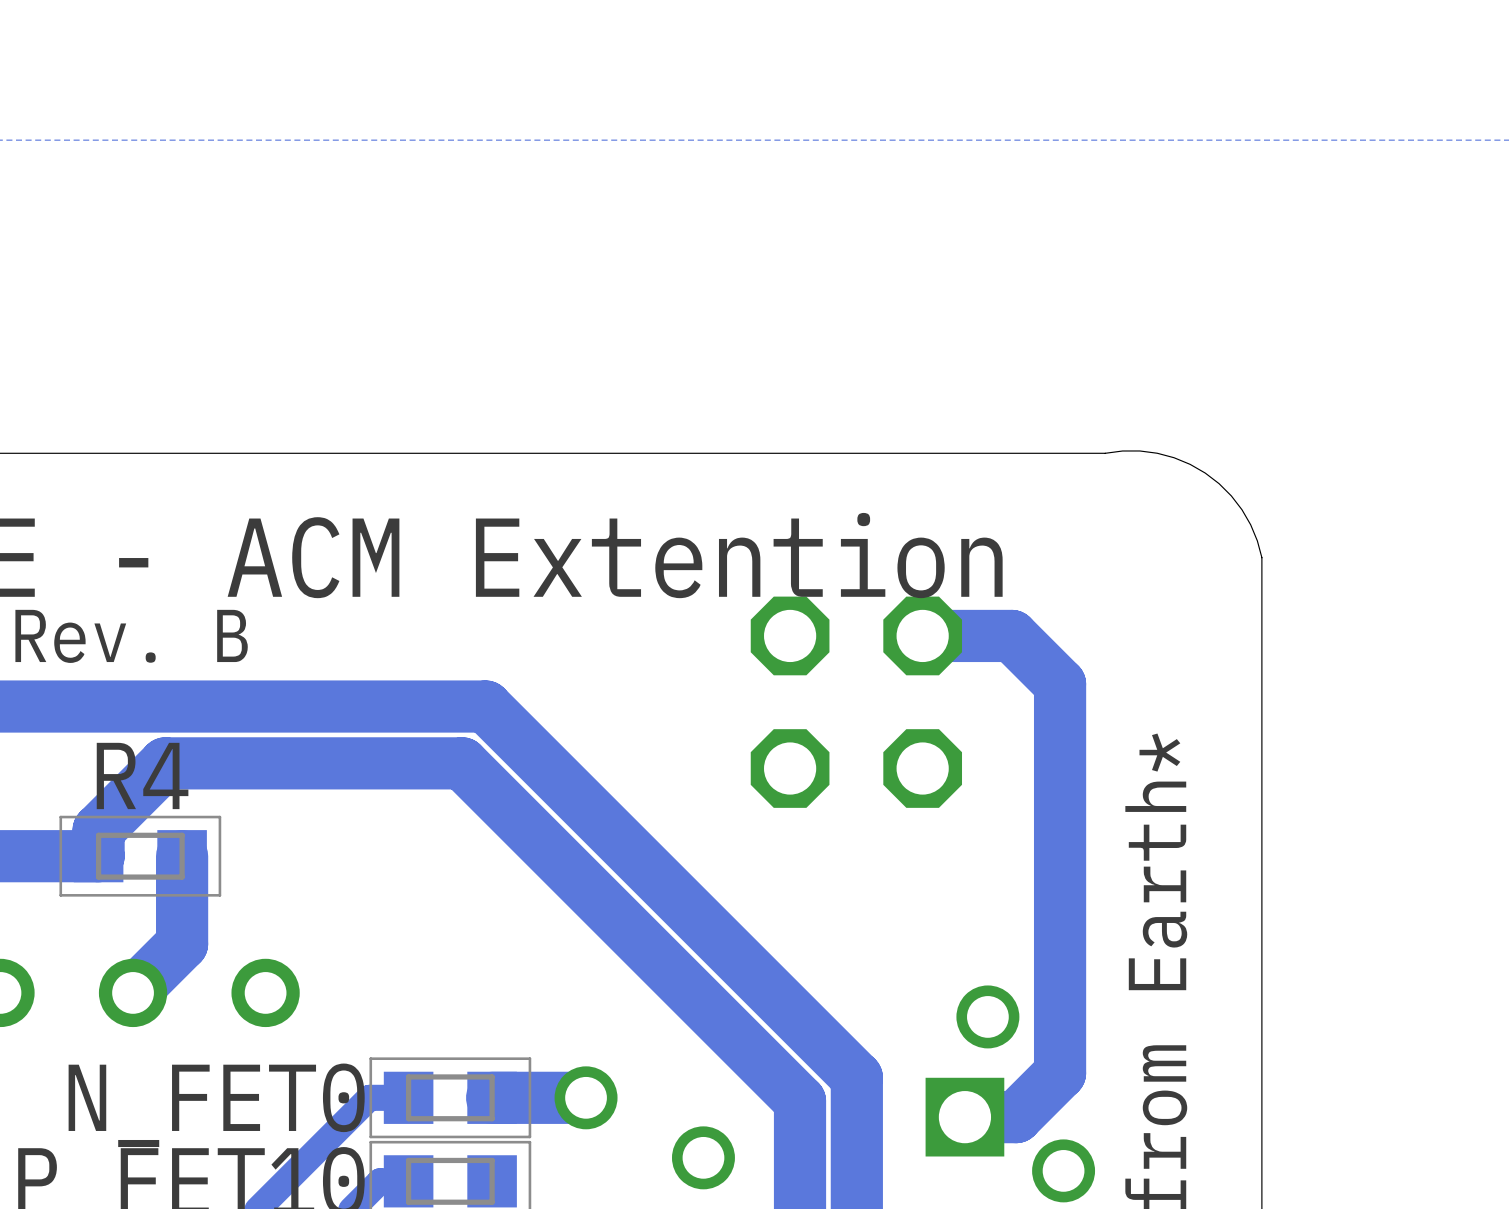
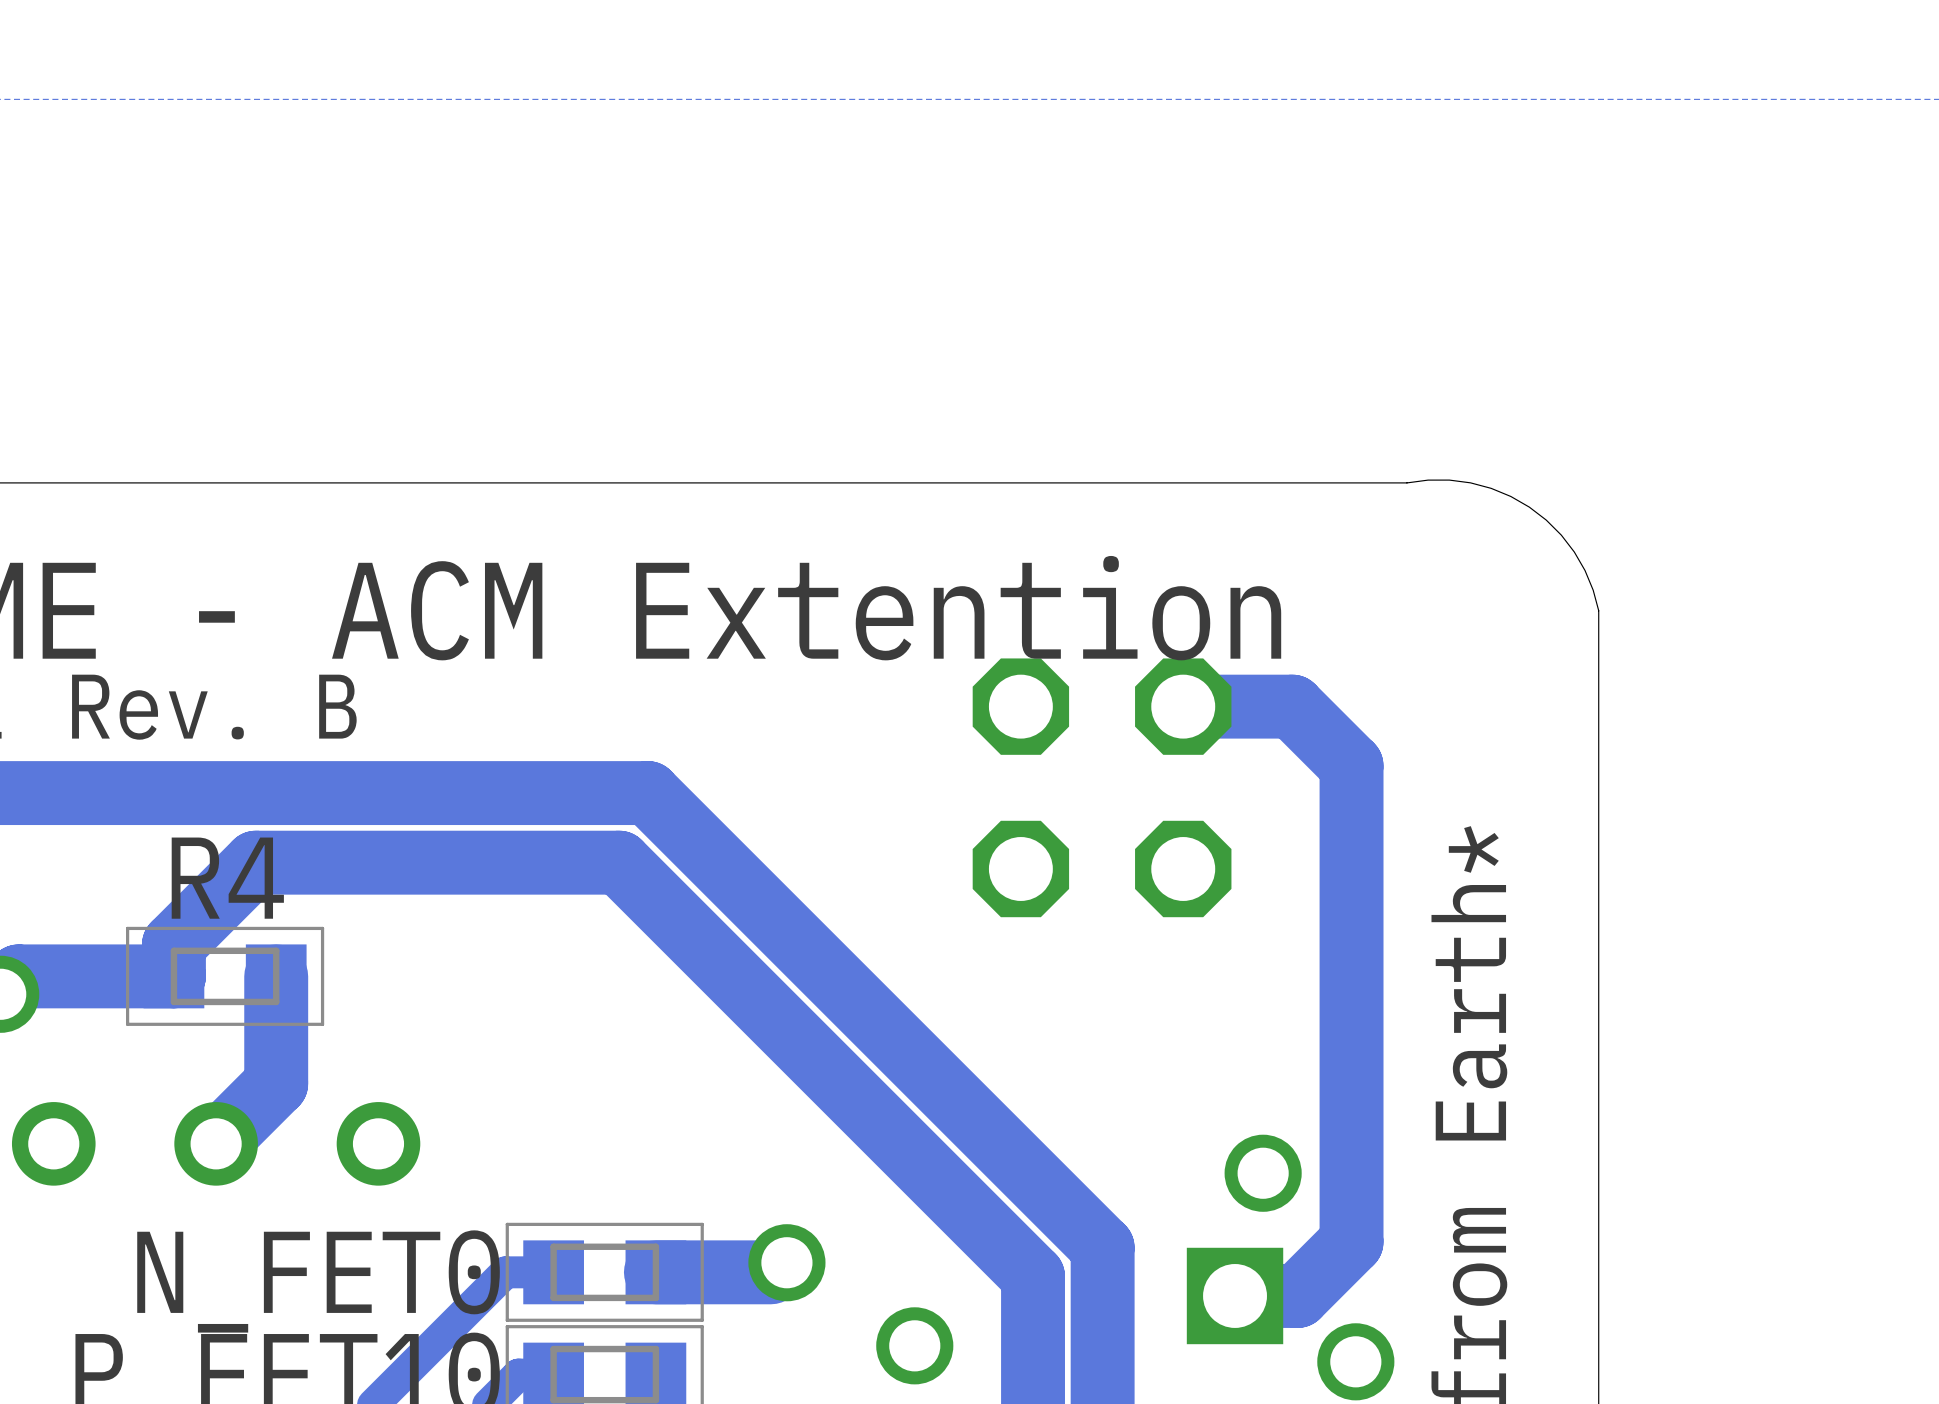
via position: (586, 1097) -> (786, 1262)

